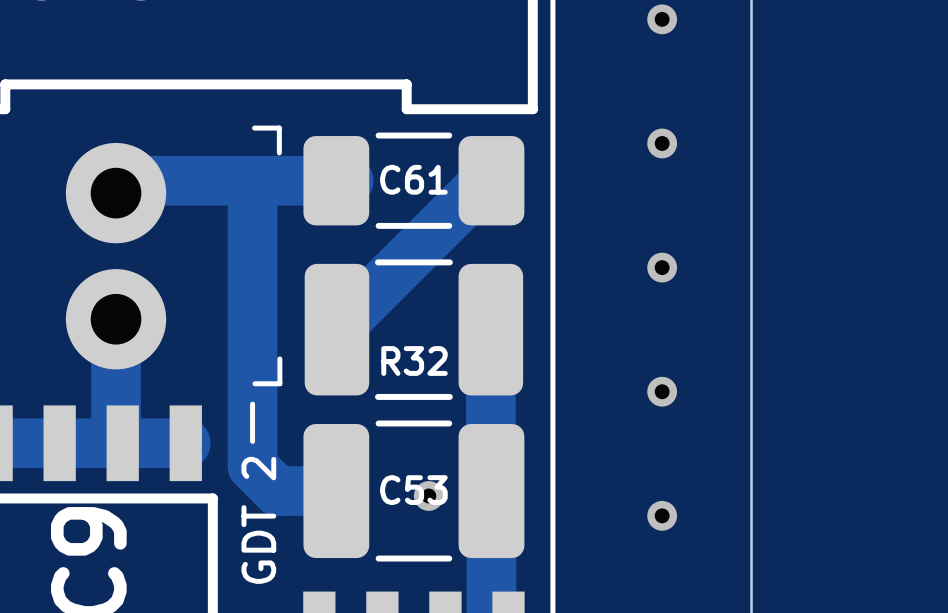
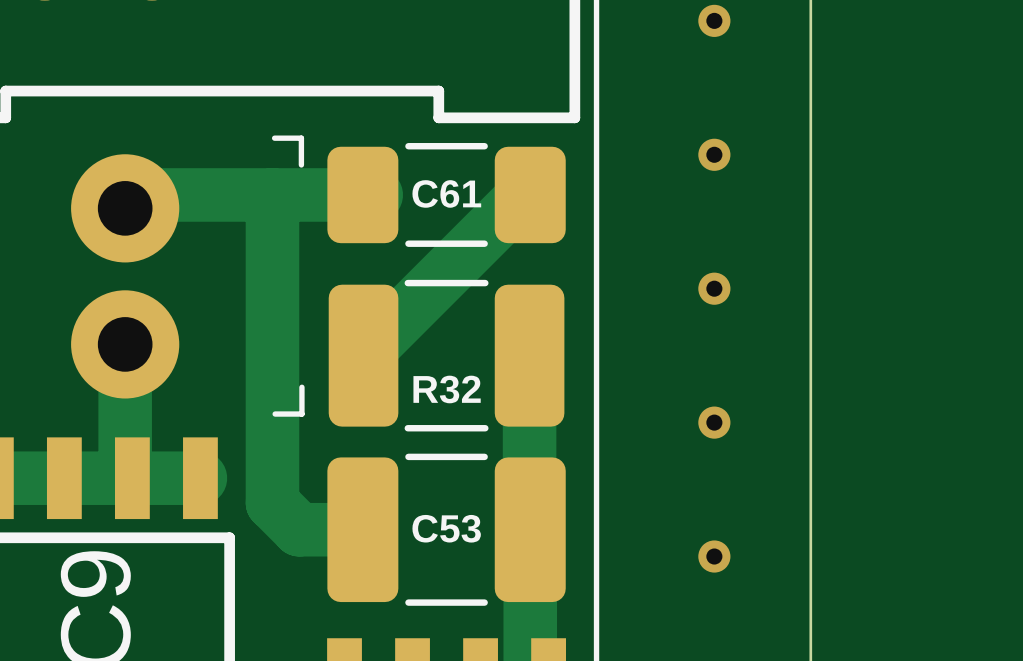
line: (252, 404) (252, 441) -> none
via: (428, 495) -> none
text: GDT 2 (258, 520) -> none

